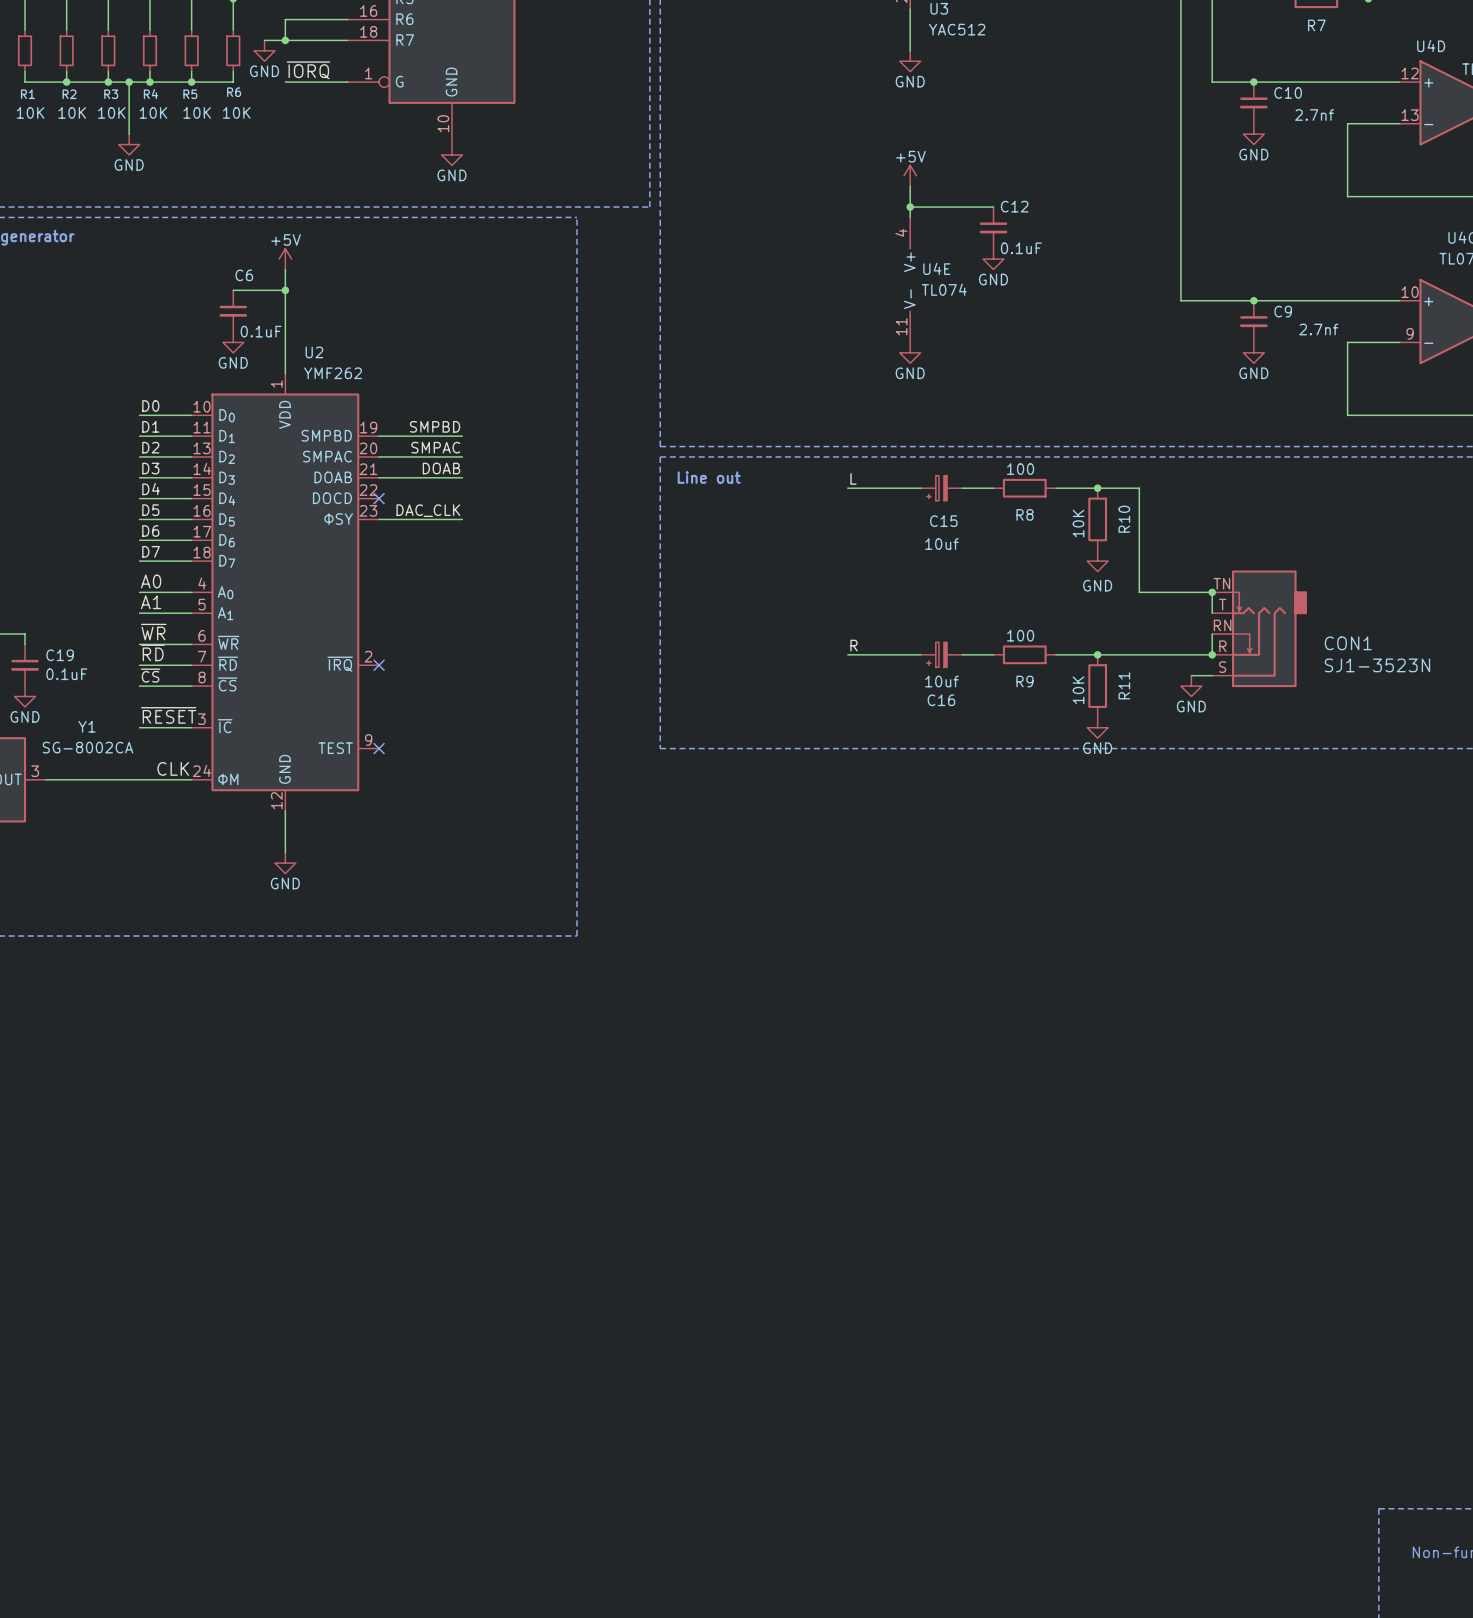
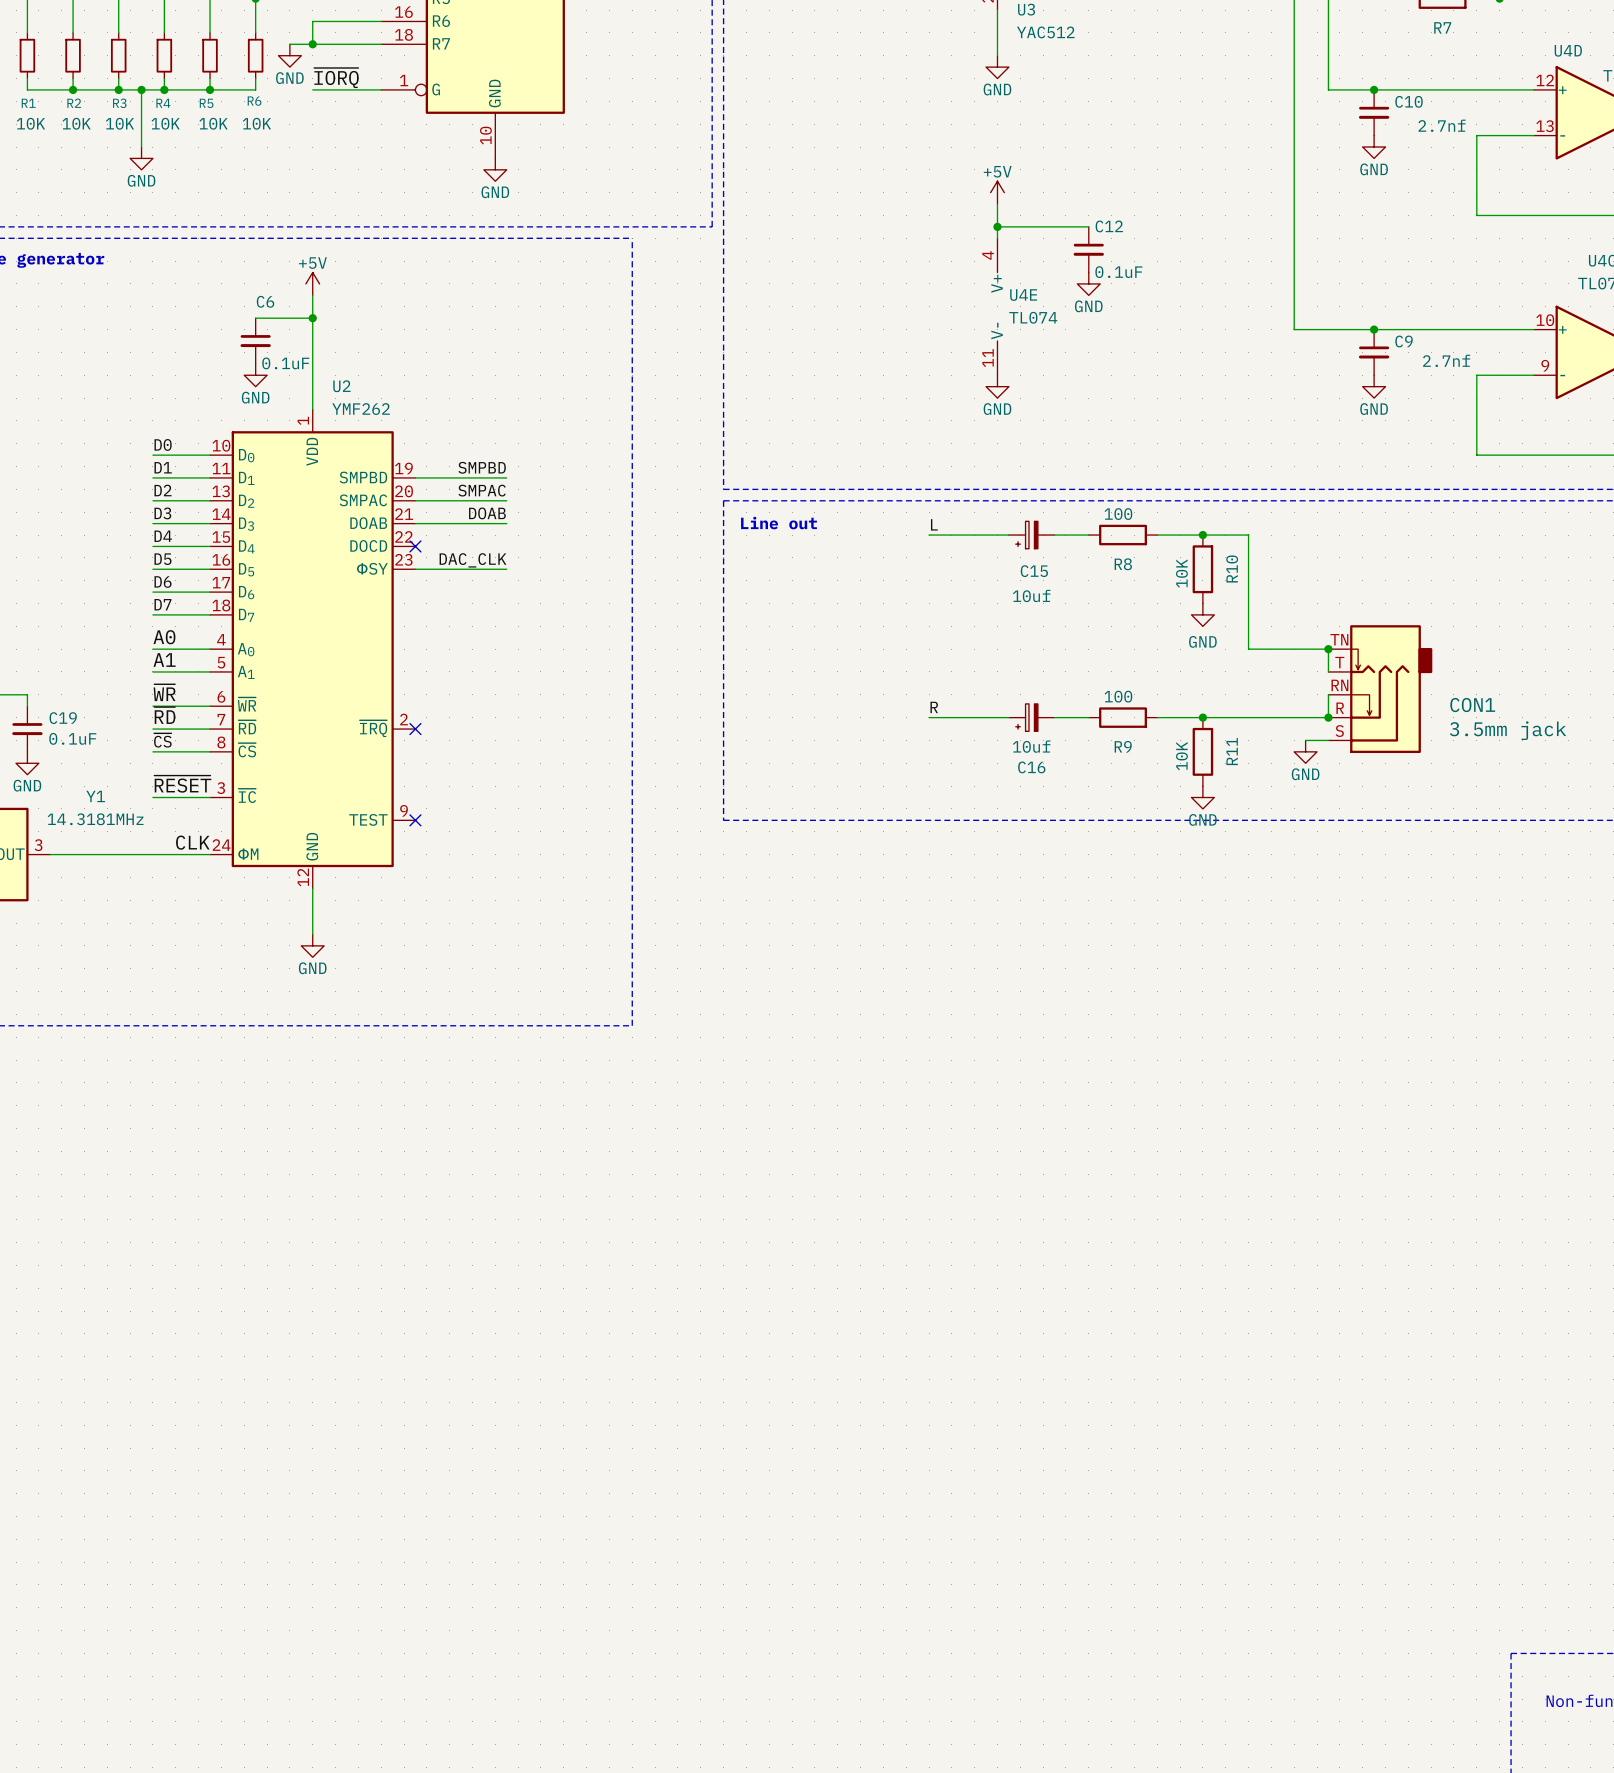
CON1 value: SJ1-3523N (1377, 665) -> 3.5mm jack (1508, 730)
Y1 value: SG-8002CA (87, 747) -> 14.3181MHz (95, 819)

